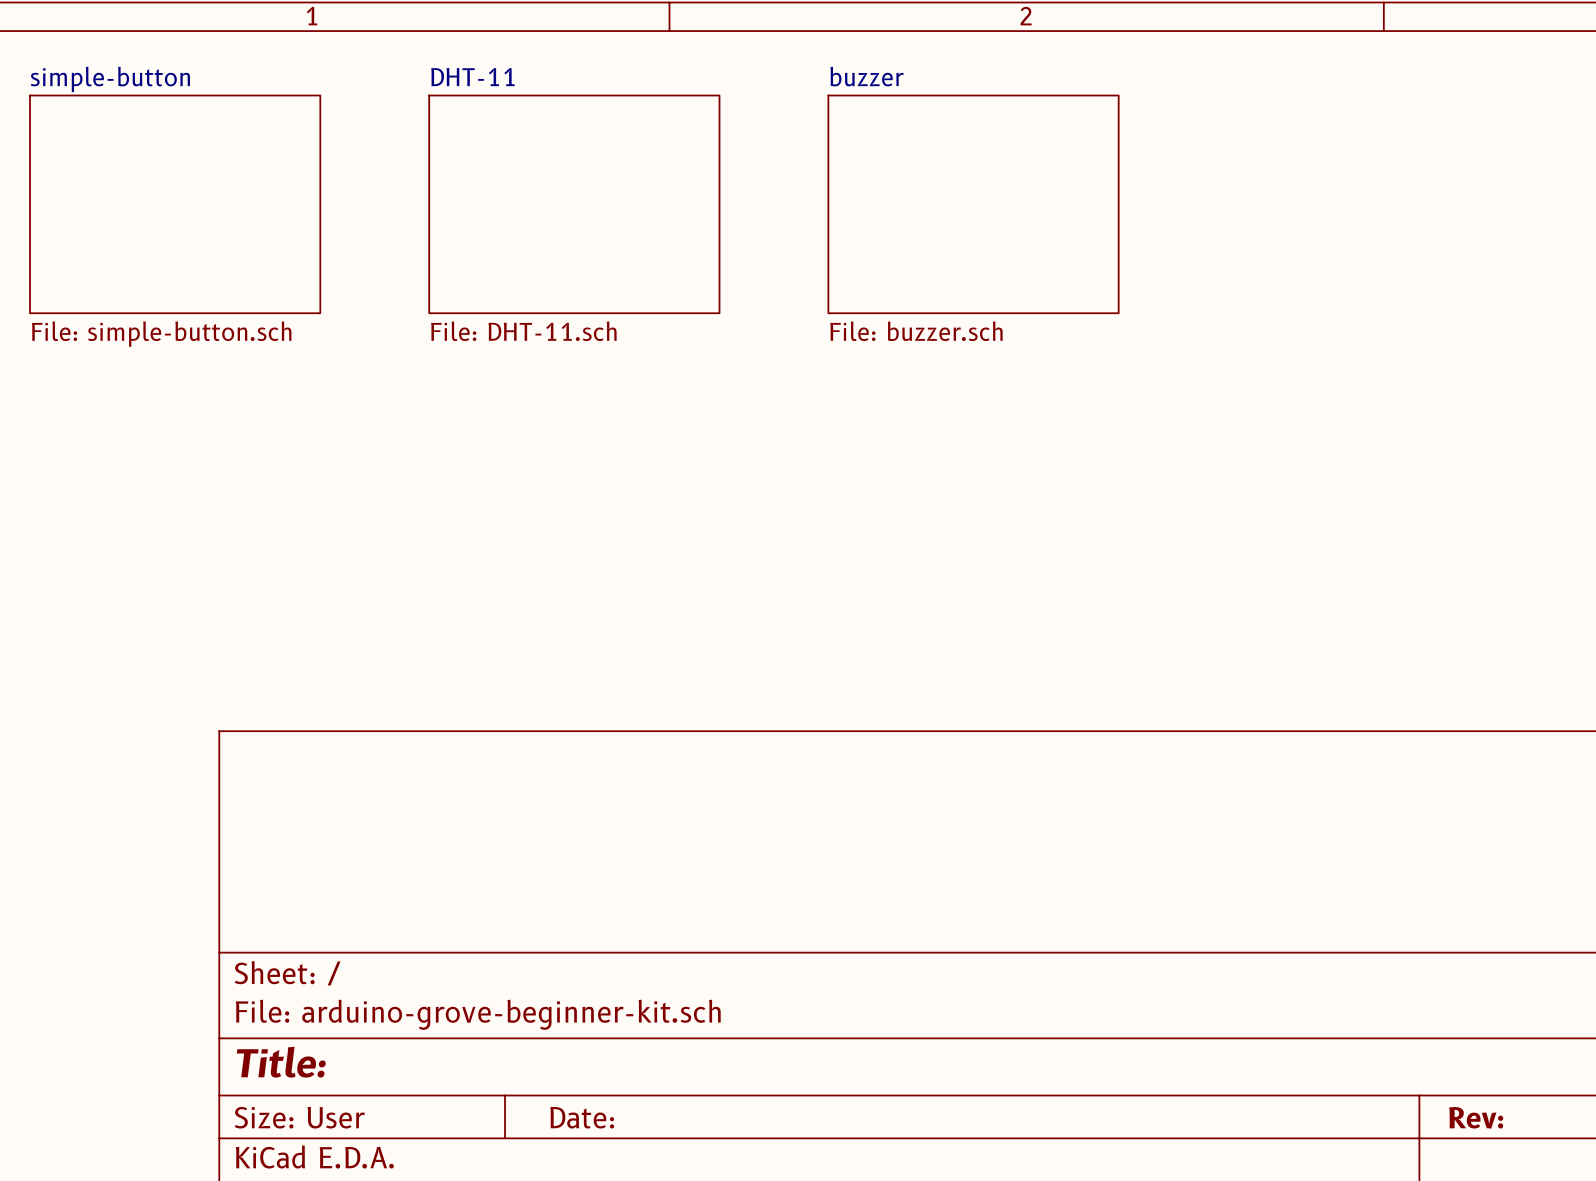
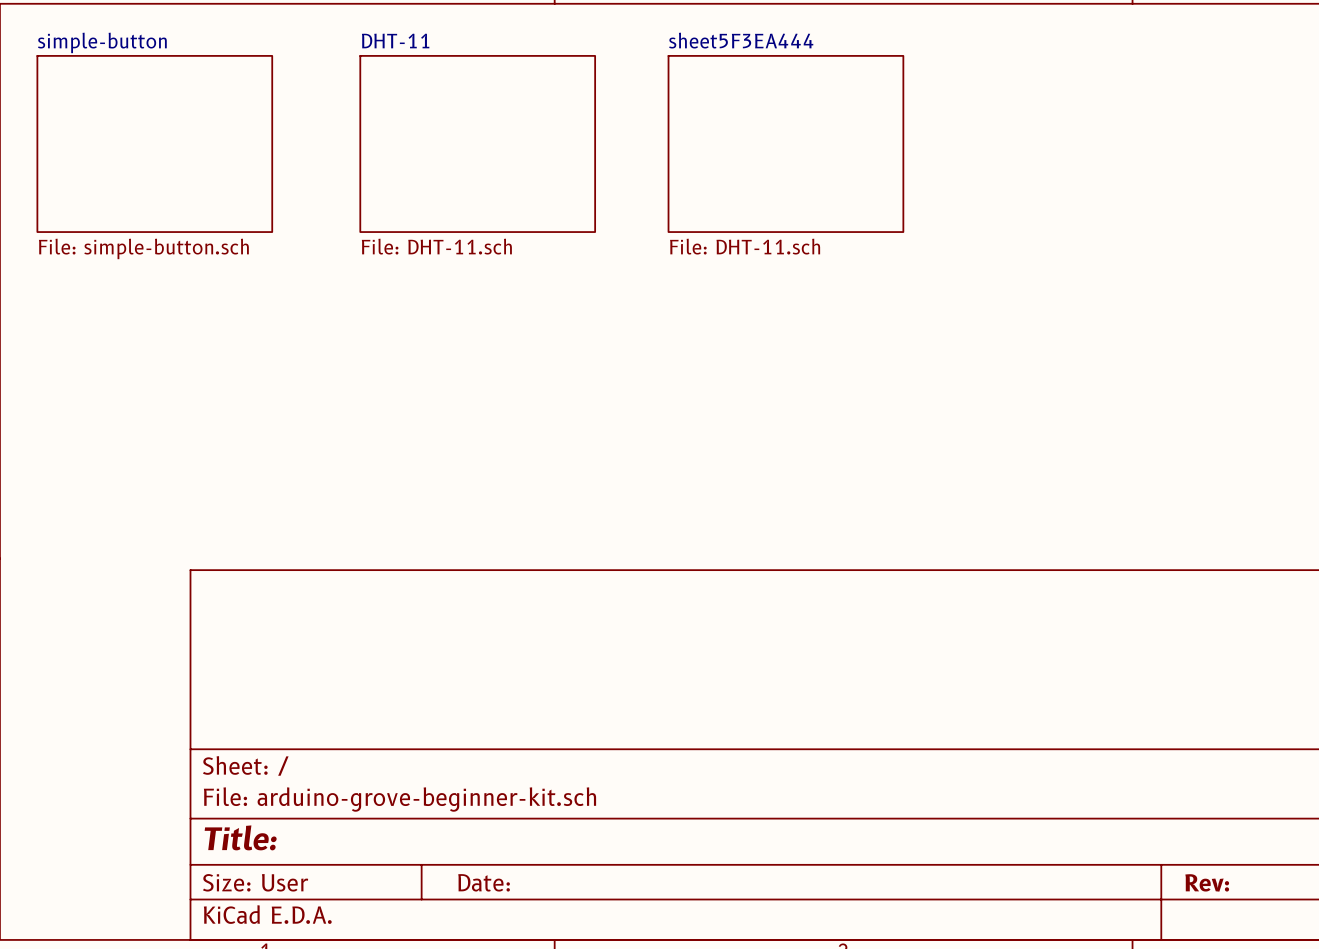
sheet sheet5F3EA444: none -> File: DHT-11.sch (785, 143)
sheet buzzer: File: buzzer.sch (973, 204) -> none

